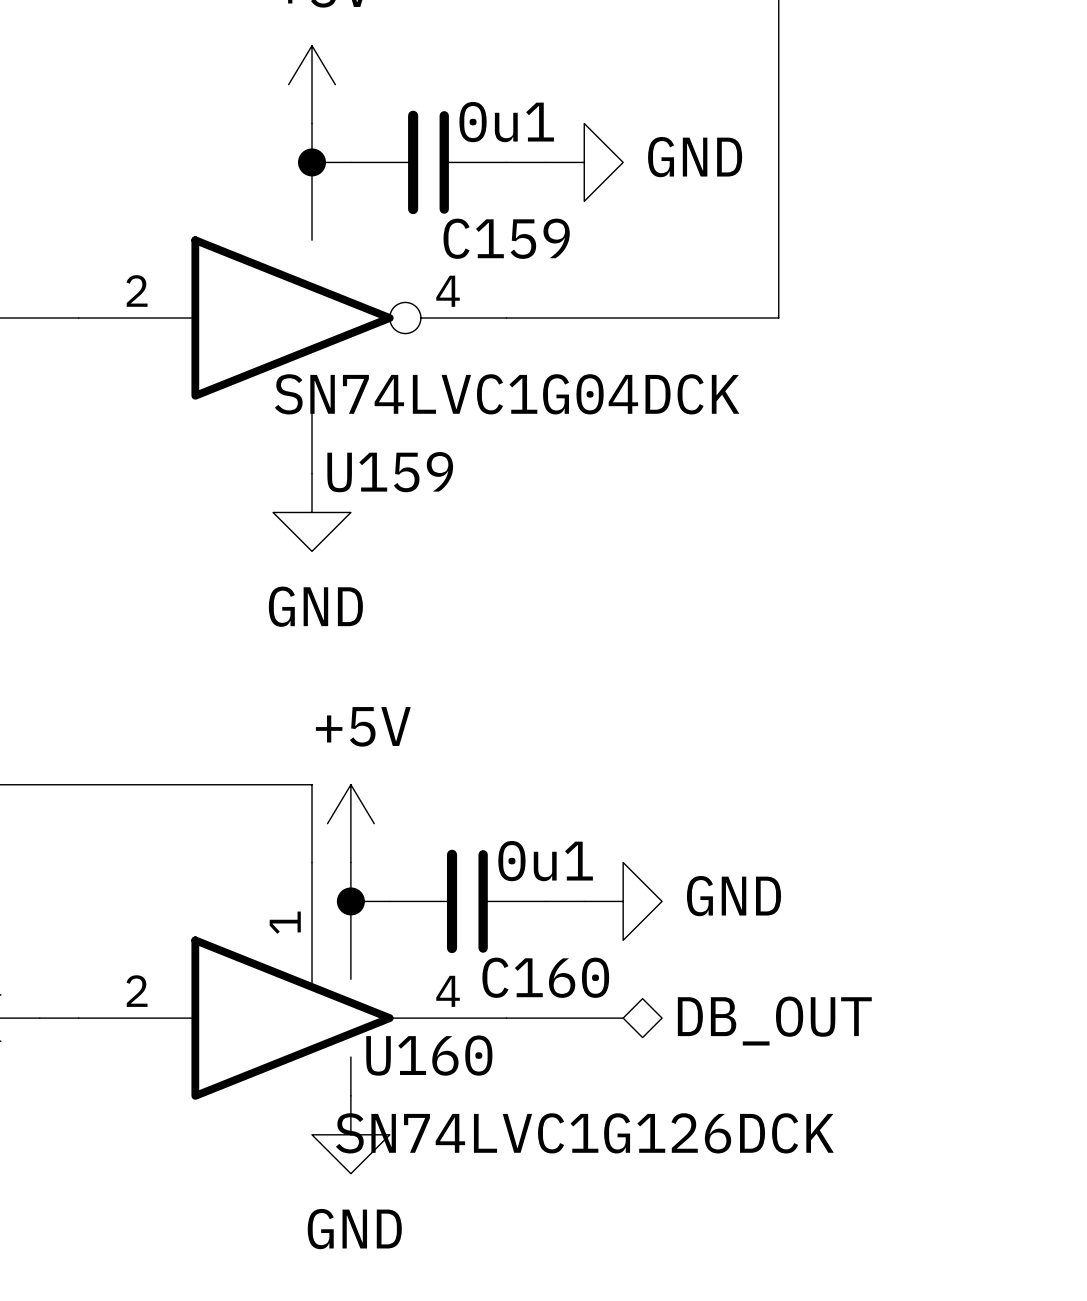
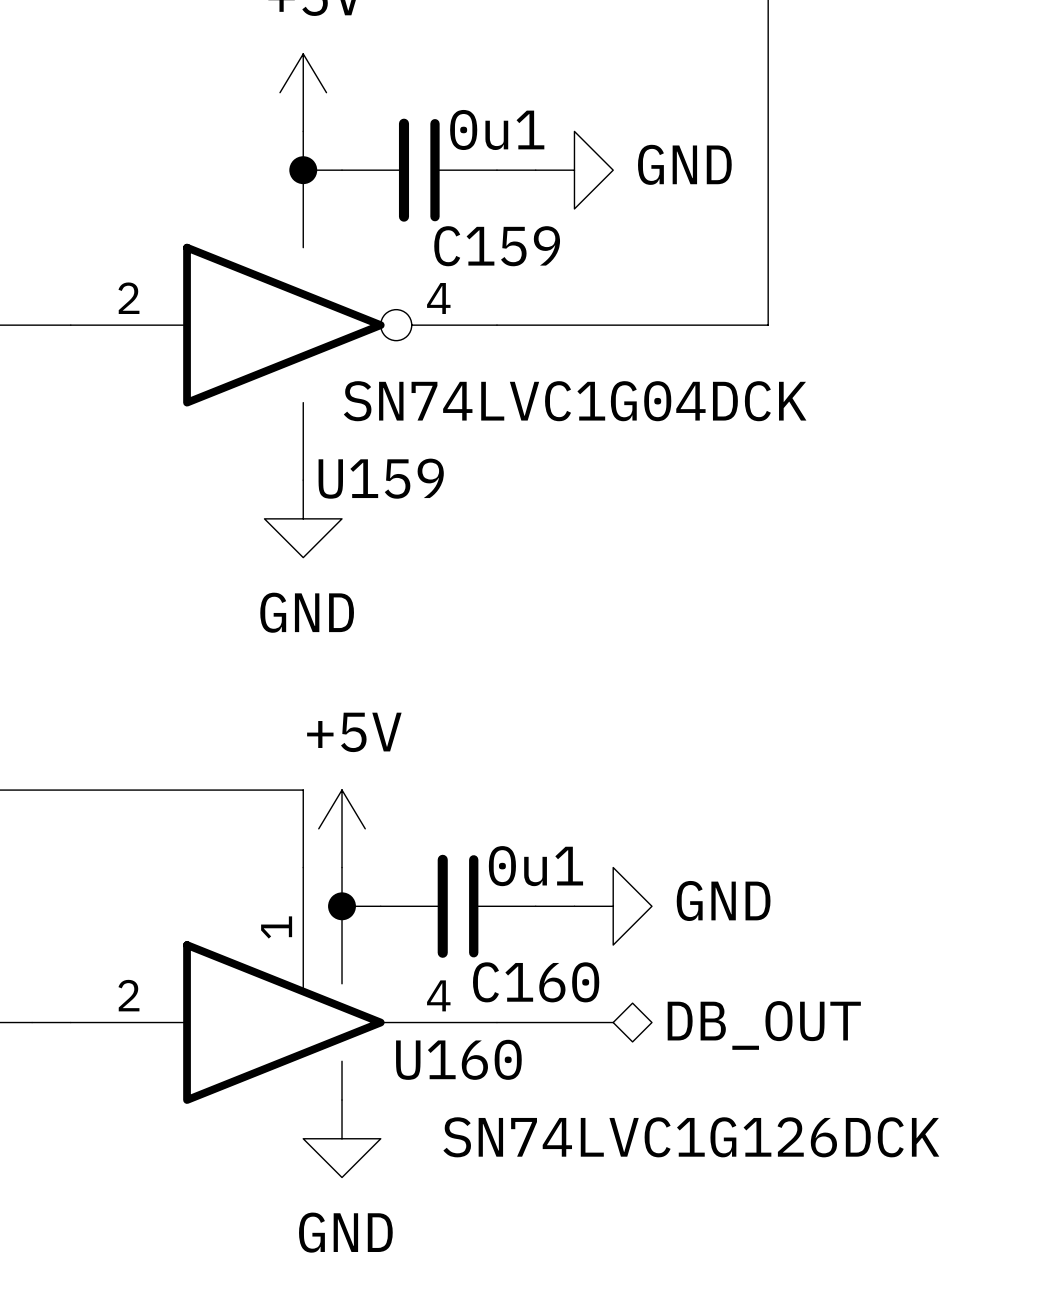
U159 value position: SN74LVC1G04DCK (507, 394) -> SN74LVC1G04DCK (575, 401)
U160 name position: U160 (429, 1055) -> U160 (458, 1059)
U160 value position: SN74LVC1G126DCK (584, 1133) -> SN74LVC1G126DCK (691, 1137)

